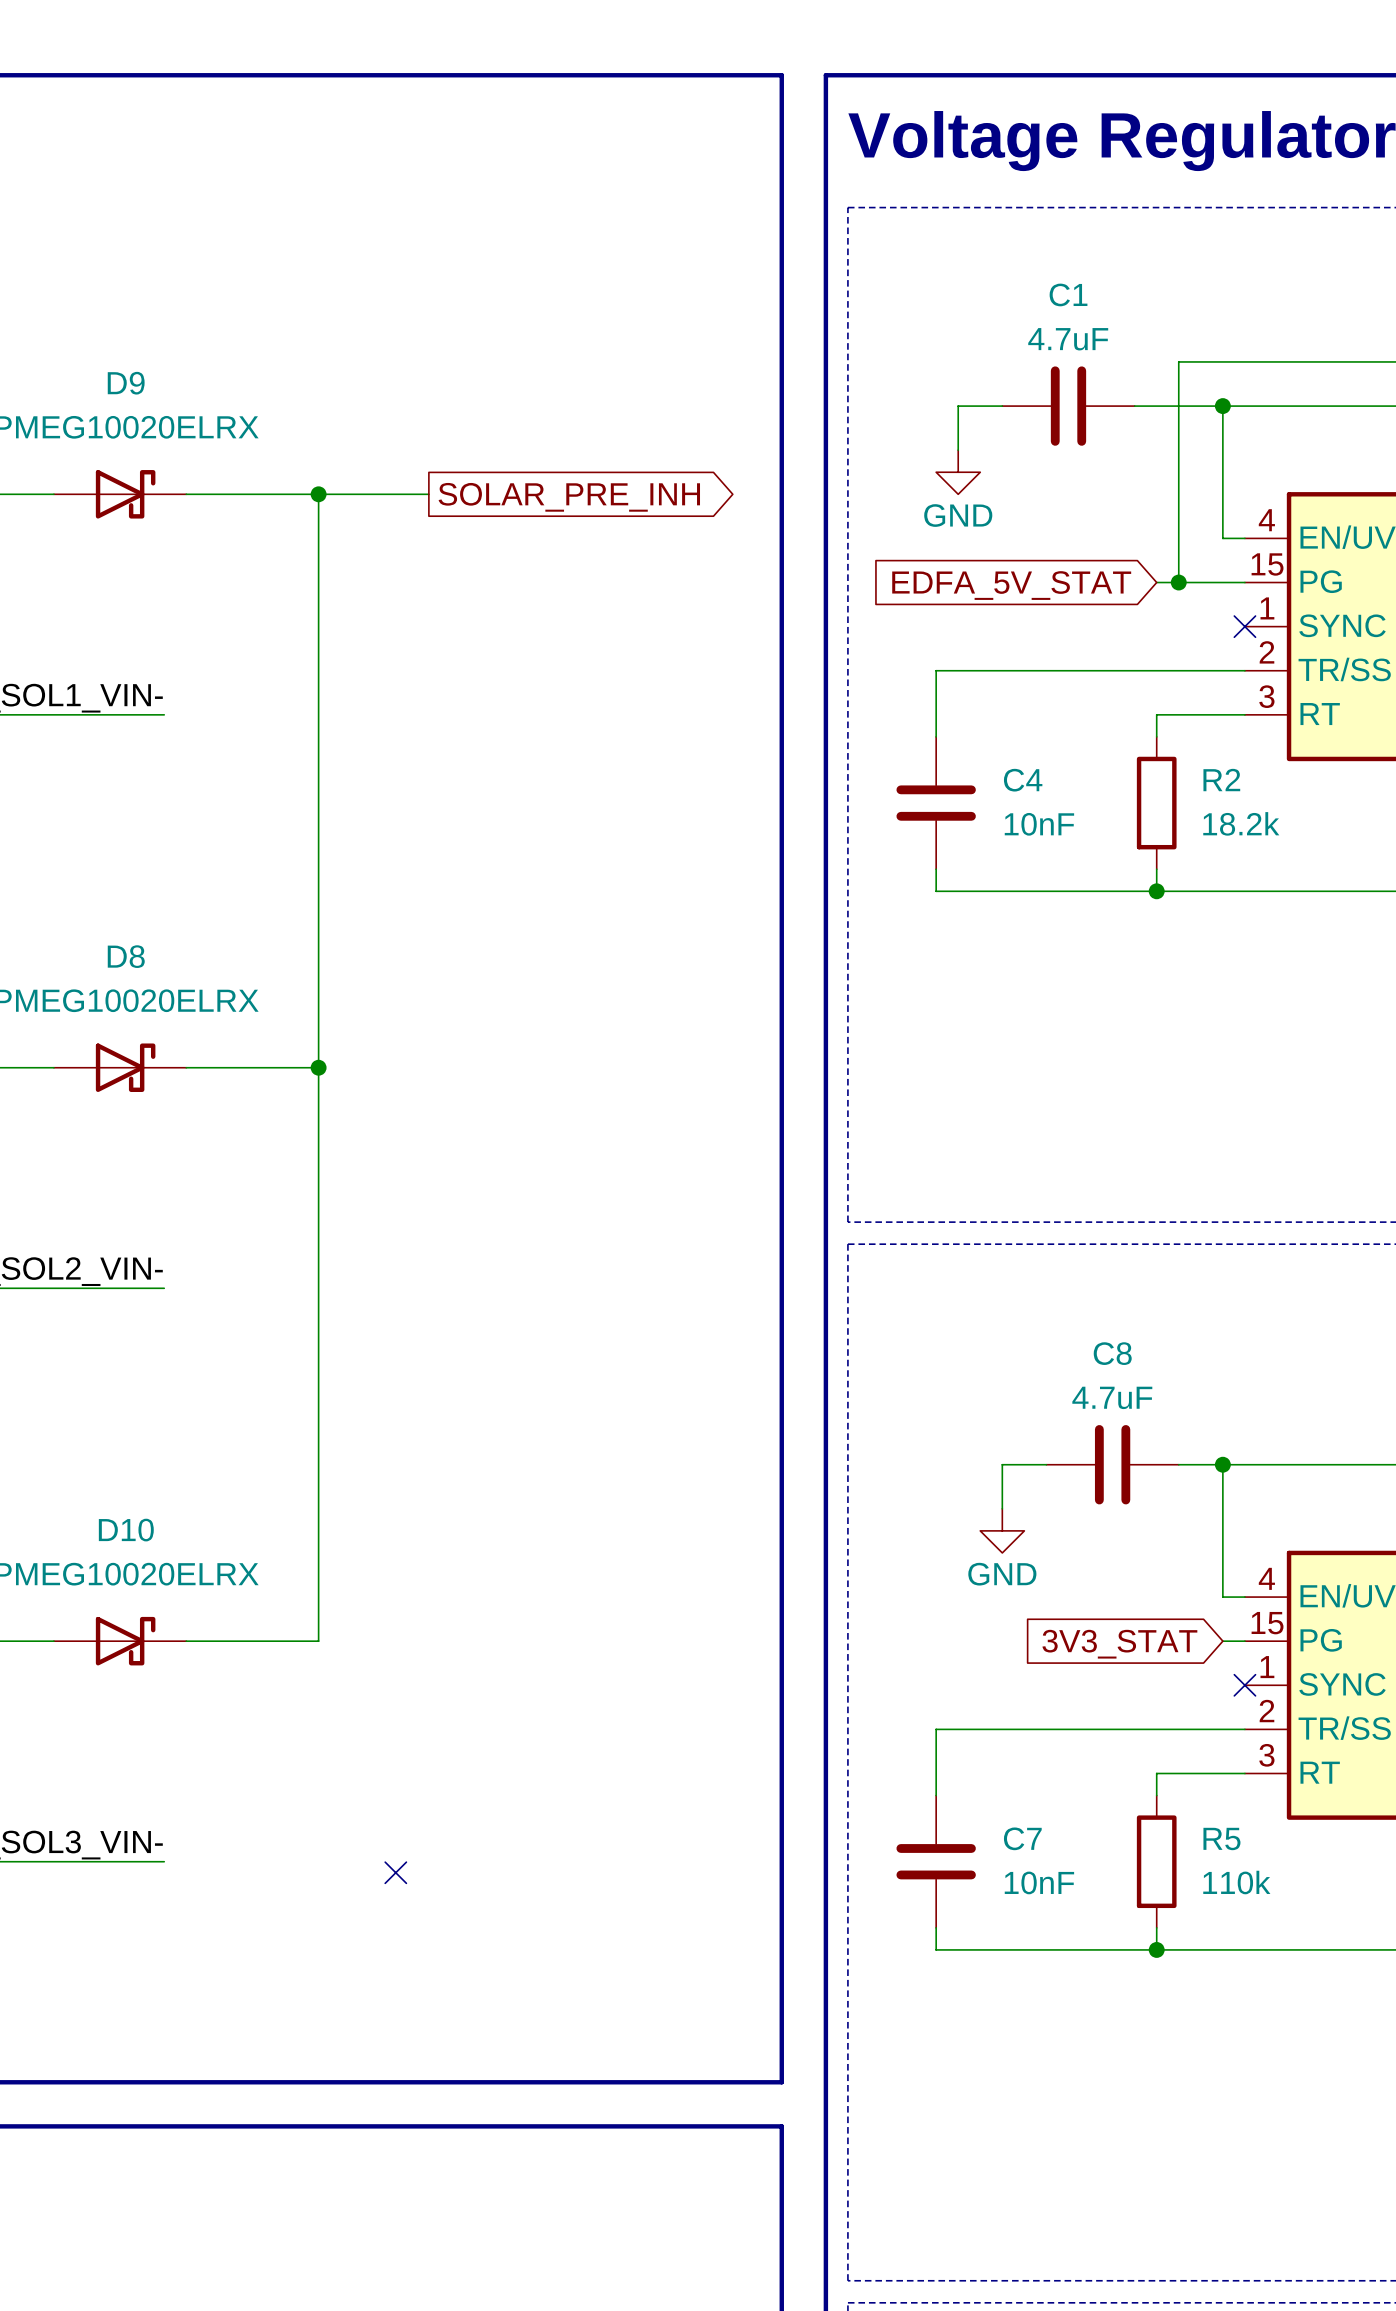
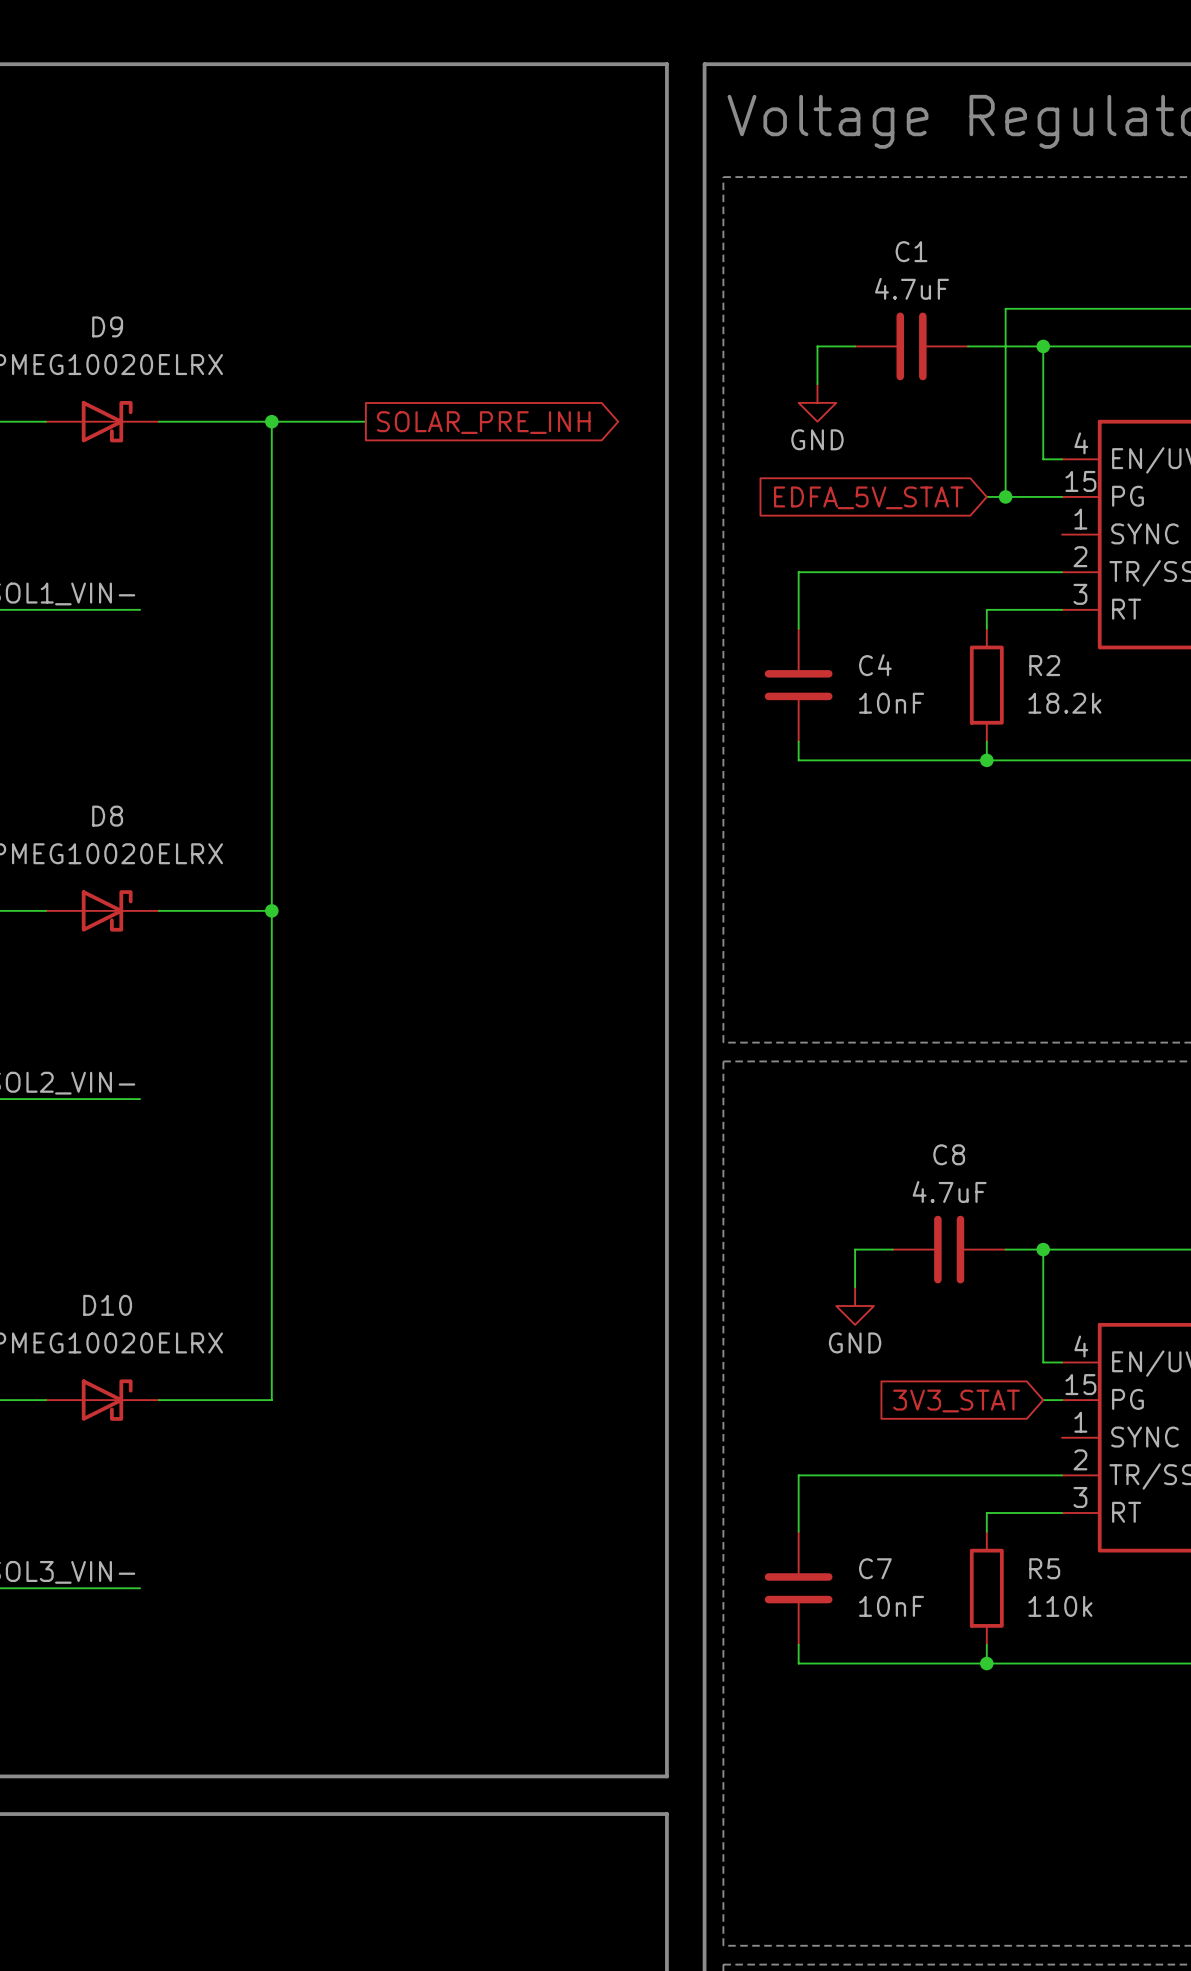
no-connect mark: (1244, 626) -> none
no-connect mark: (1244, 1685) -> none
no-connect mark: (395, 1872) -> none

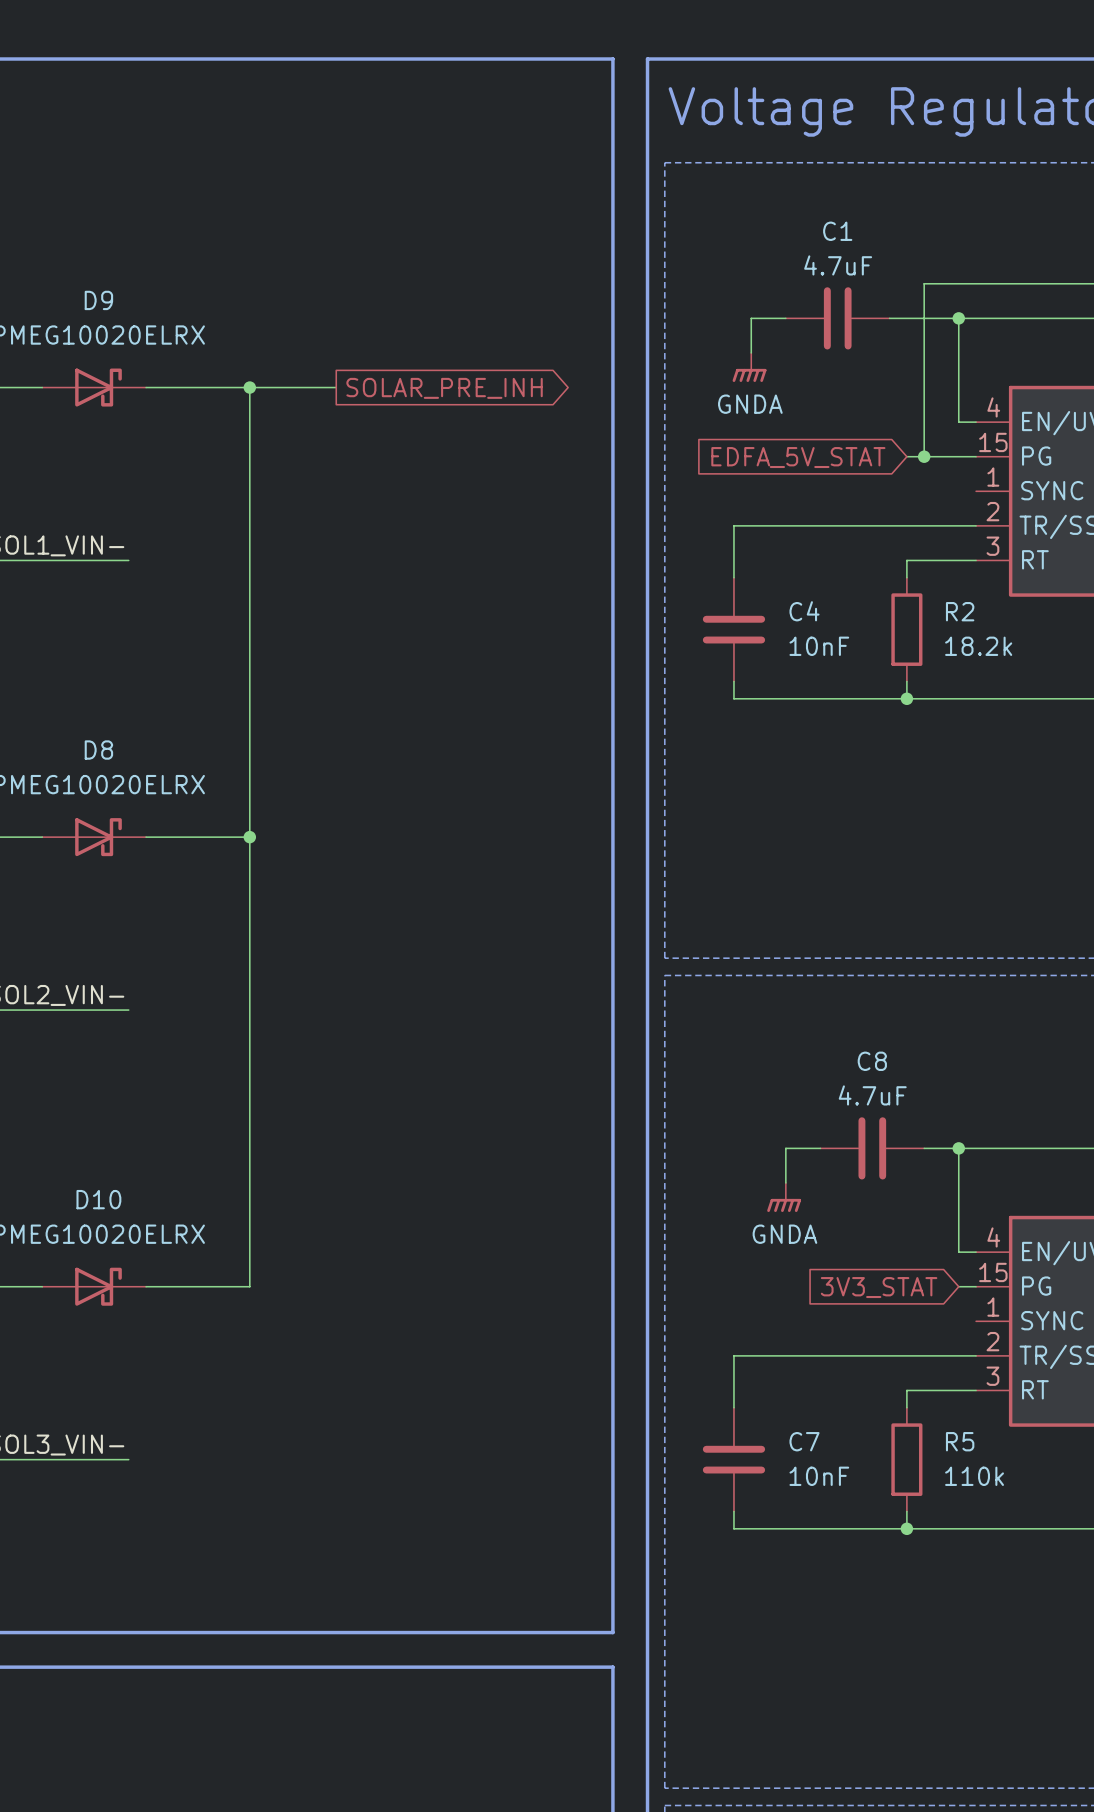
power symbol: GND (817, 402) -> GNDA (749, 367)
power symbol: GND (855, 1306) -> GNDA (784, 1197)

